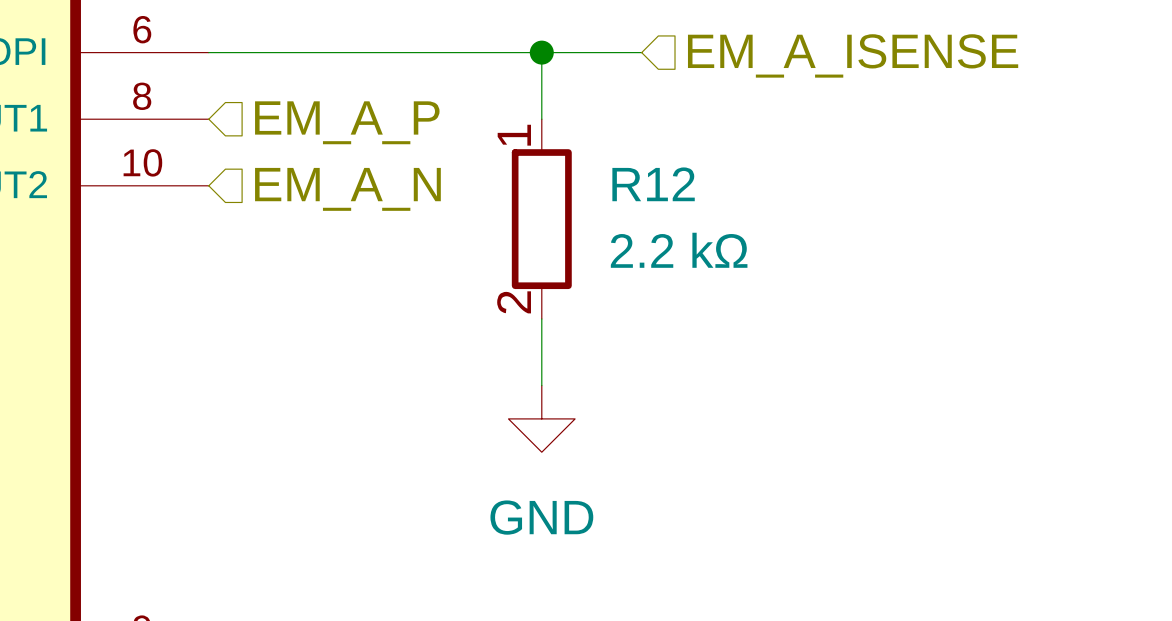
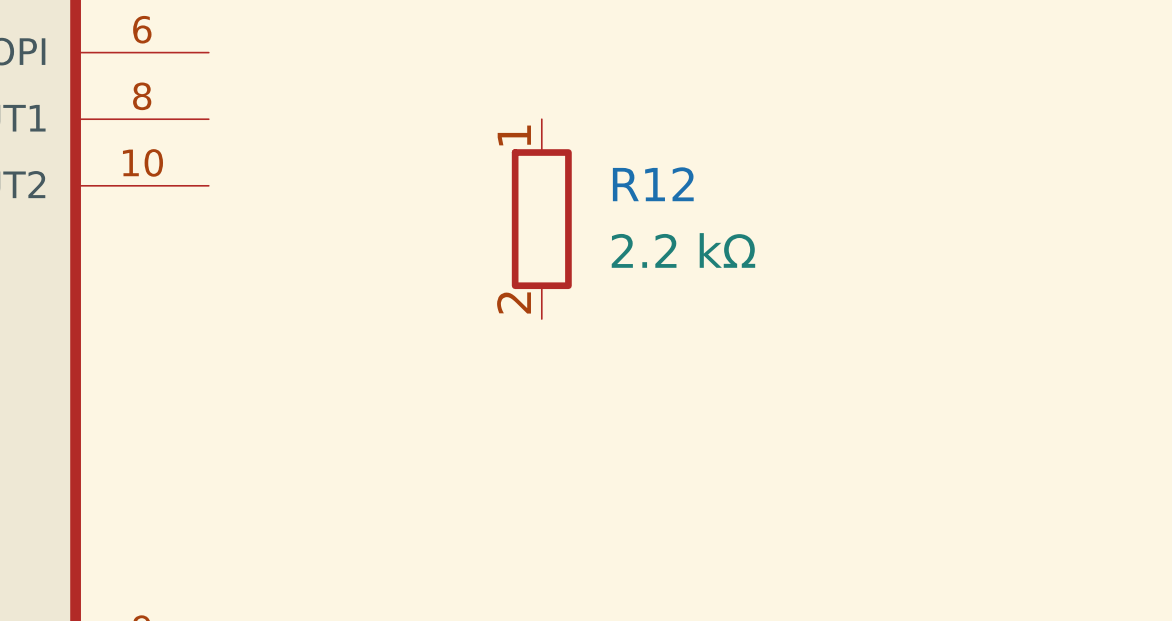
wire: (208, 52) (641, 52) -> none
wire: (541, 52) (541, 119) -> none
junction: (541, 52) -> none
hierarchical label: EM_A_ISENSE (853, 55) -> none
hierarchical label: EM_A_P (347, 122) -> none
hierarchical label: EM_A_N (347, 189) -> none
wire: (541, 319) (541, 385) -> none
power symbol: GND (541, 418) -> none

